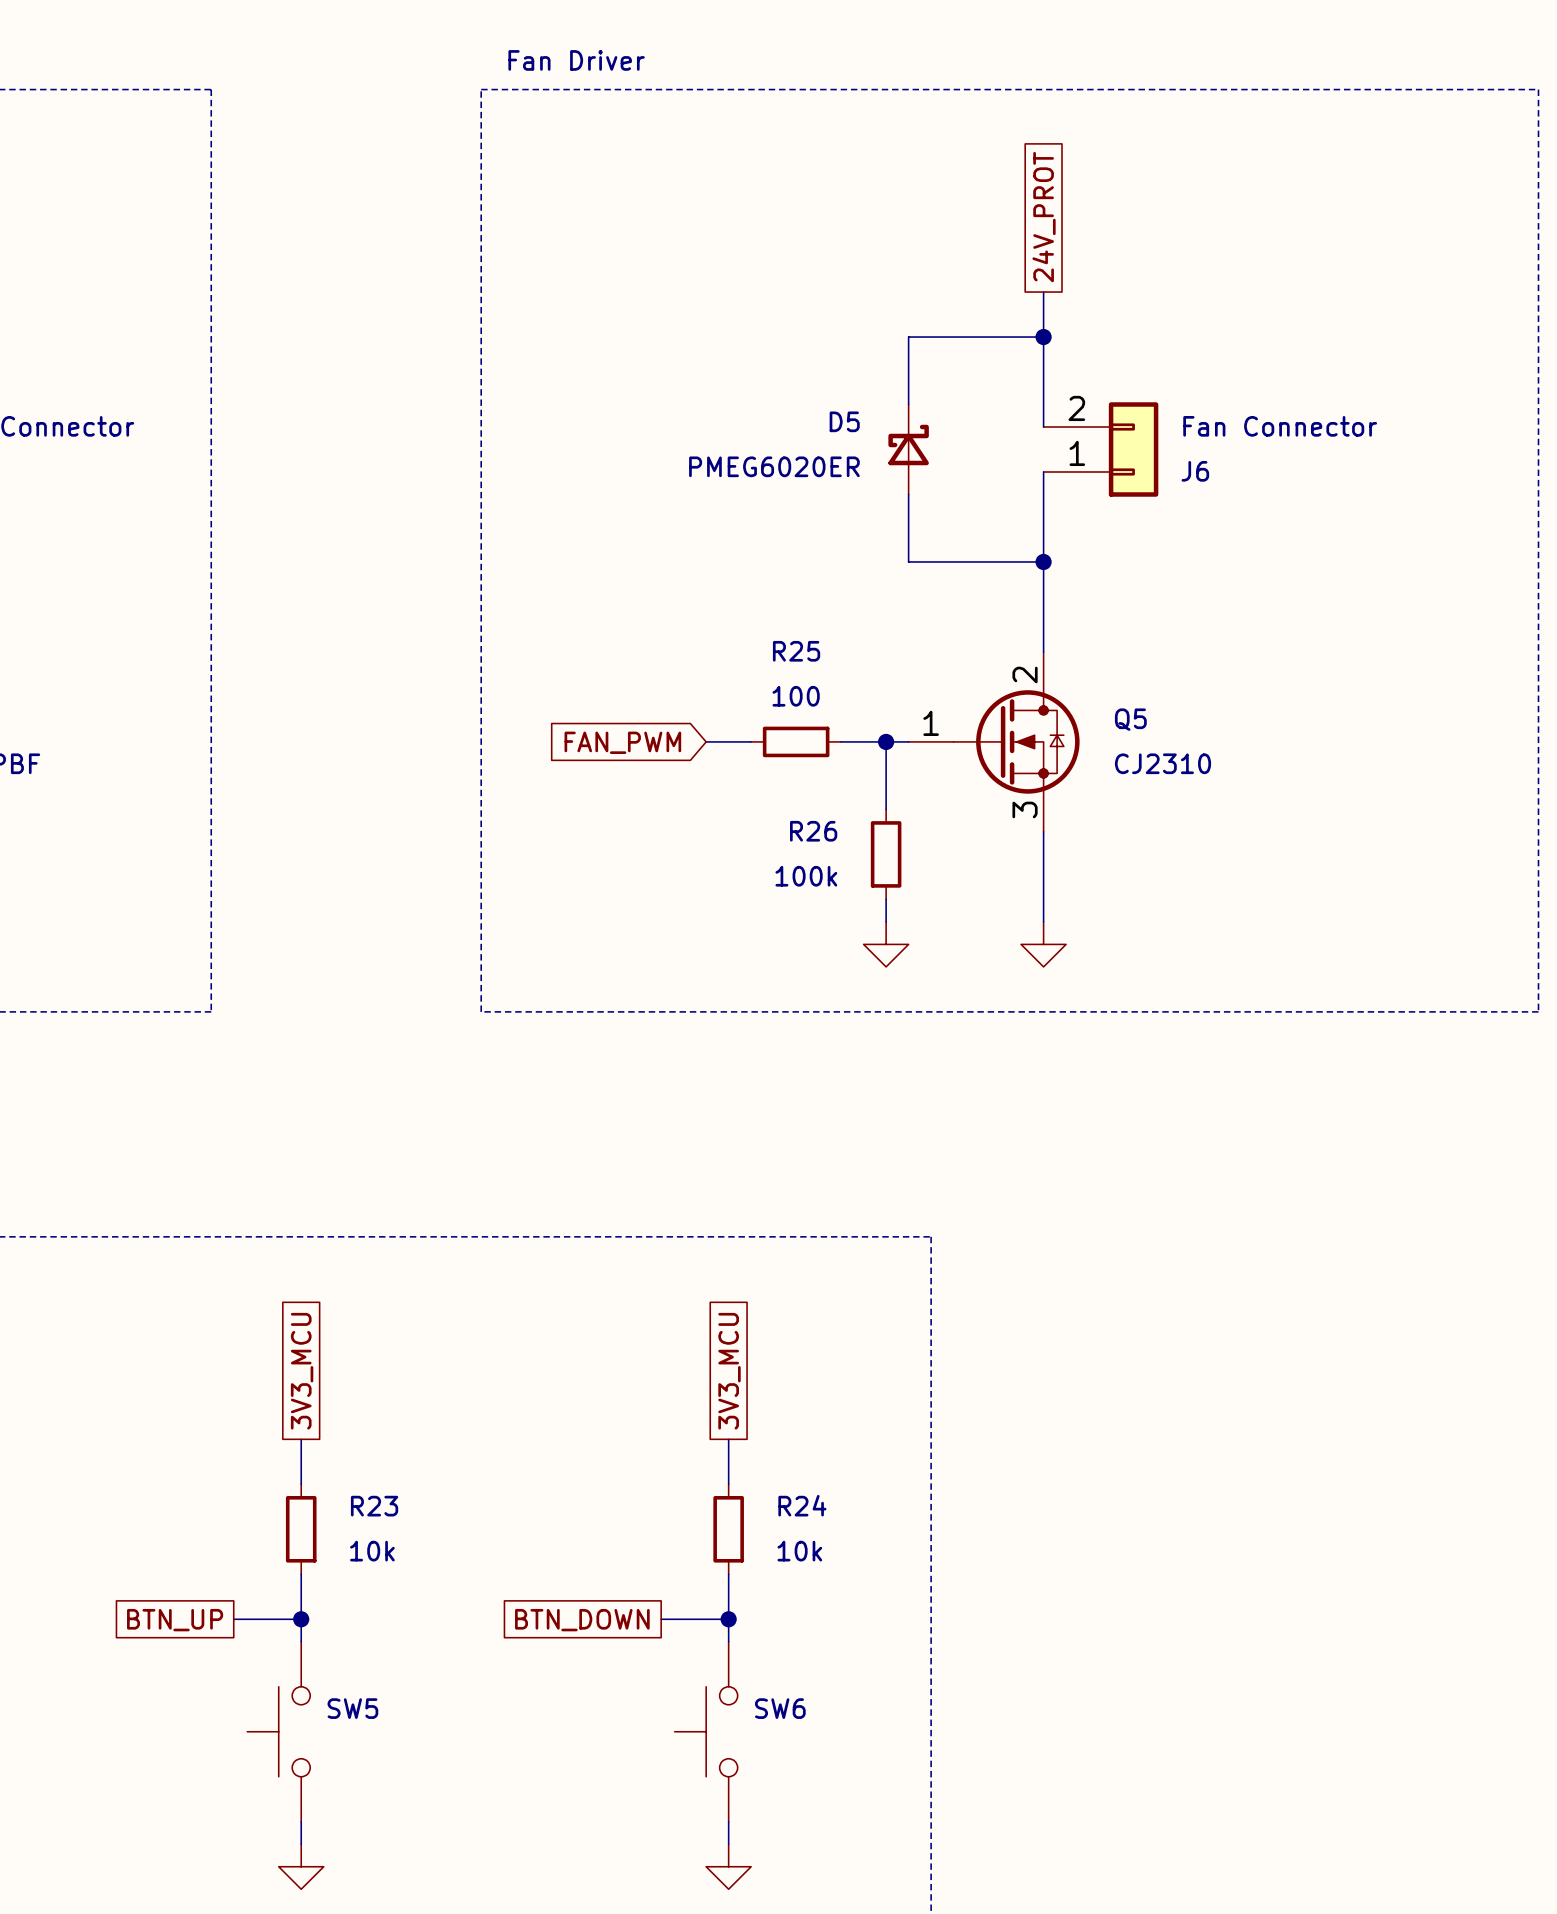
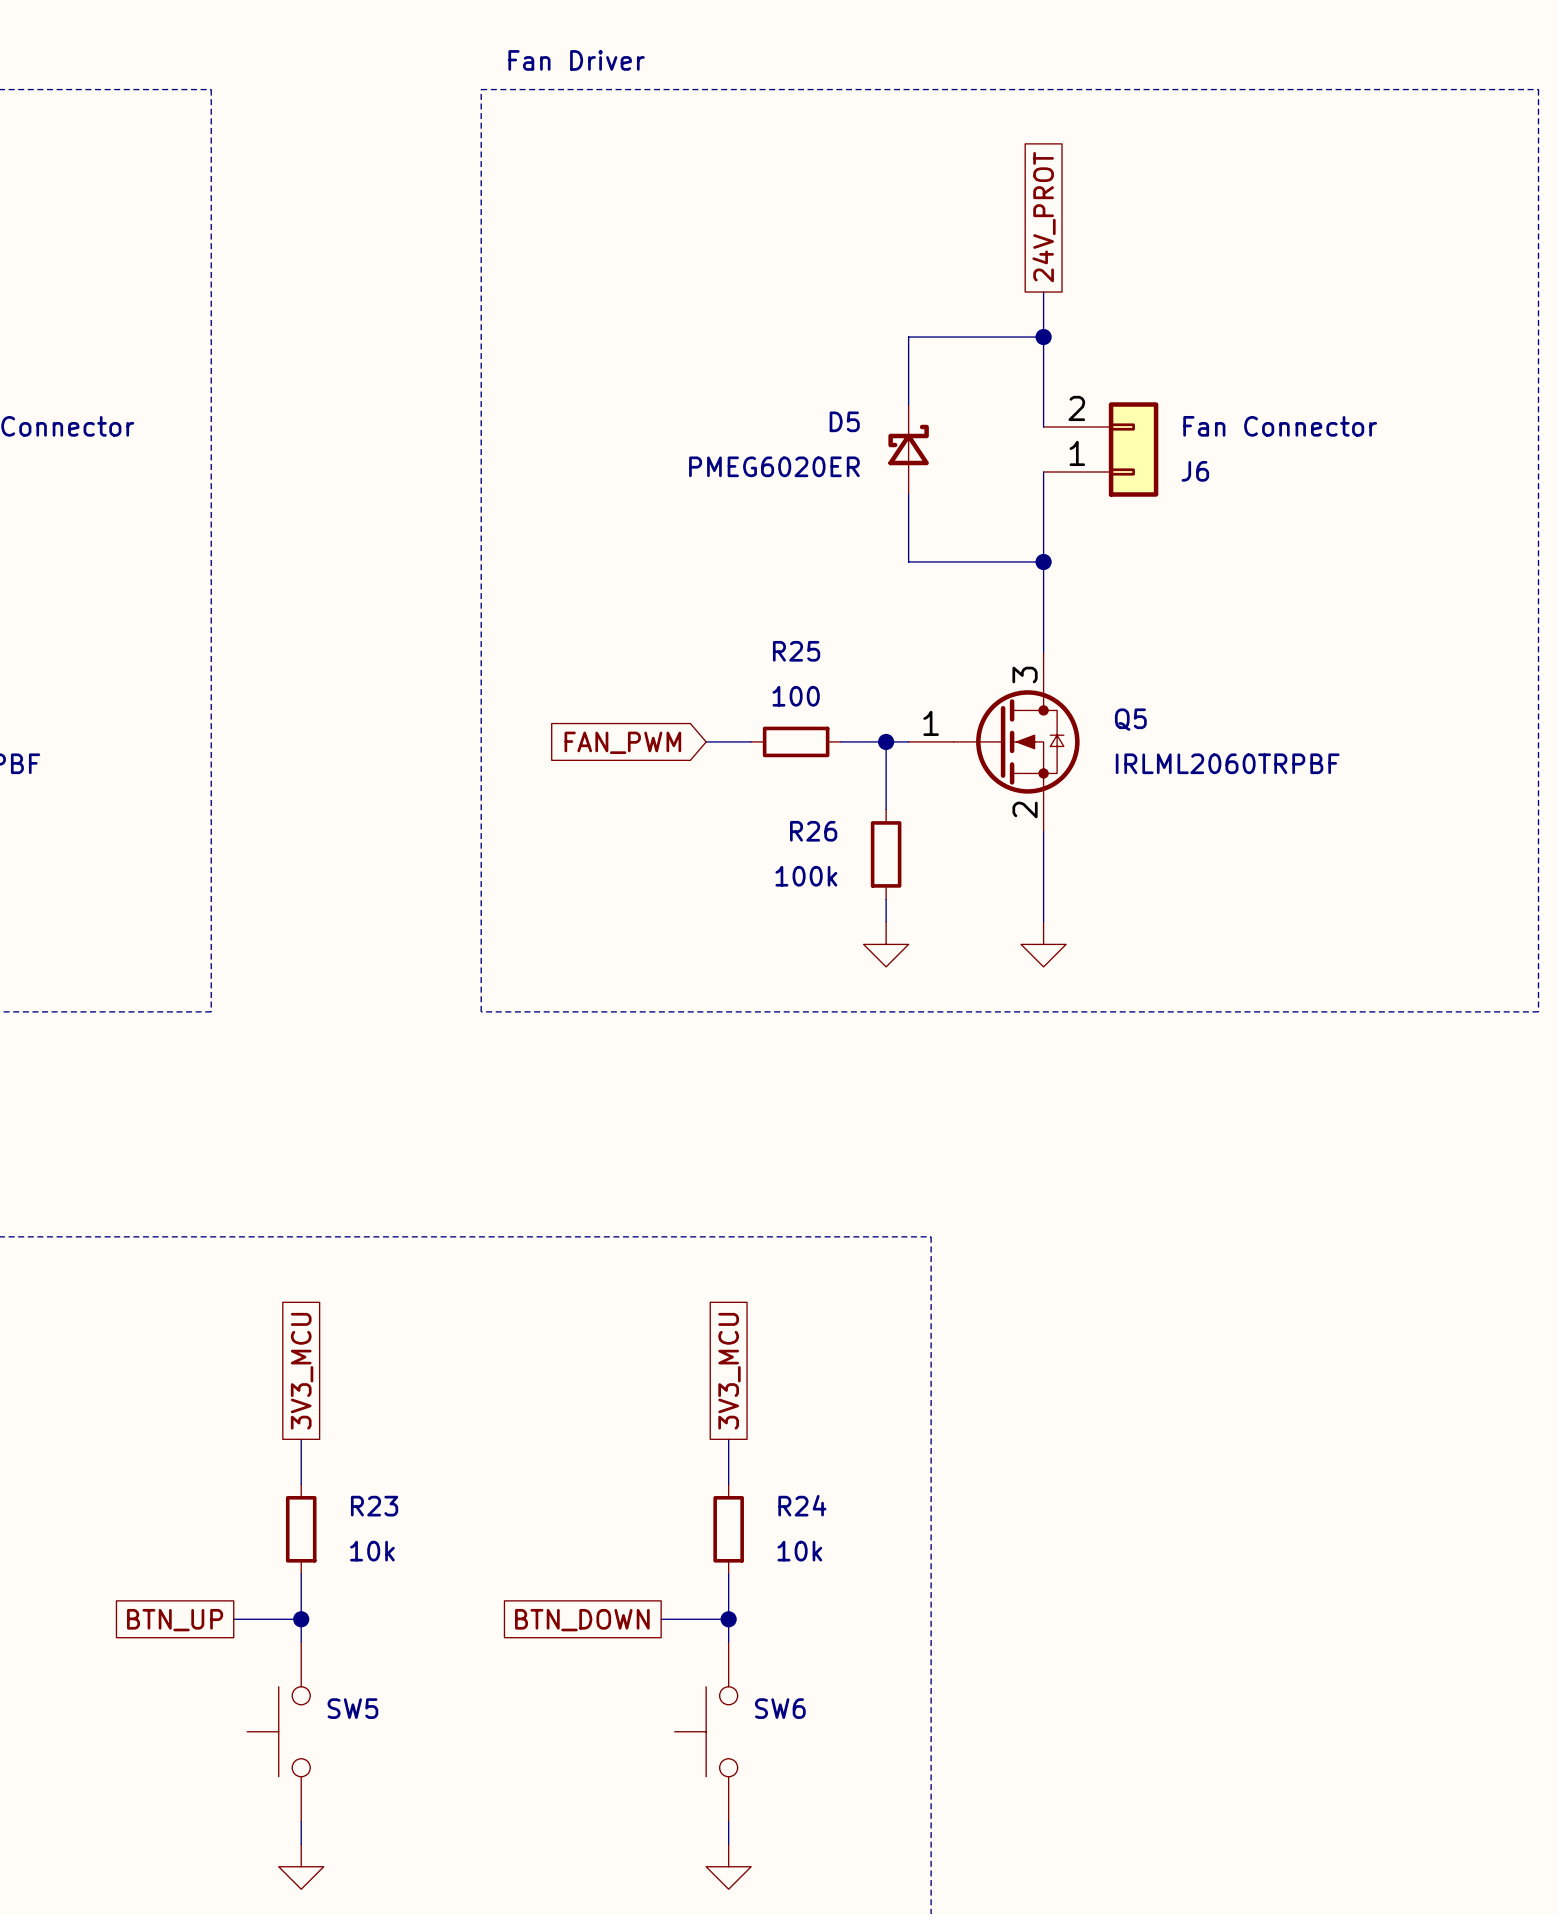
Q5 pin number: 2 (1025, 674) -> 3 (1025, 674)
Q5 value: CJ2310 (1162, 763) -> IRLML2060TRPBF (1227, 763)
Q5 pin number: 3 (1025, 809) -> 2 (1025, 809)

